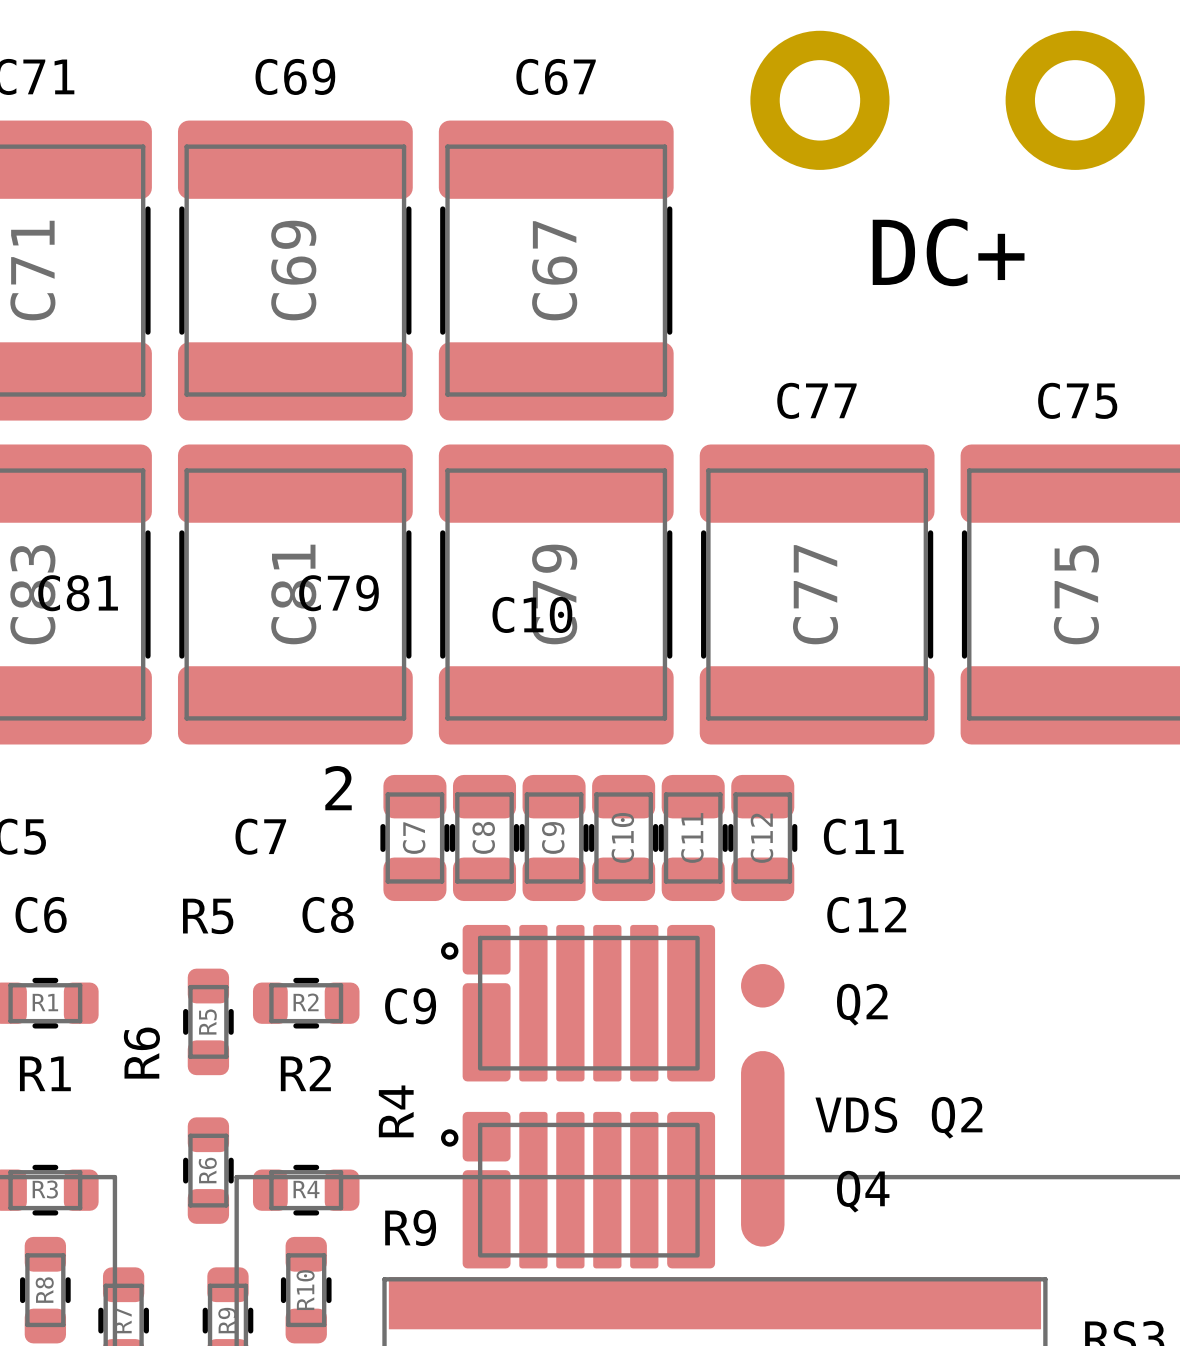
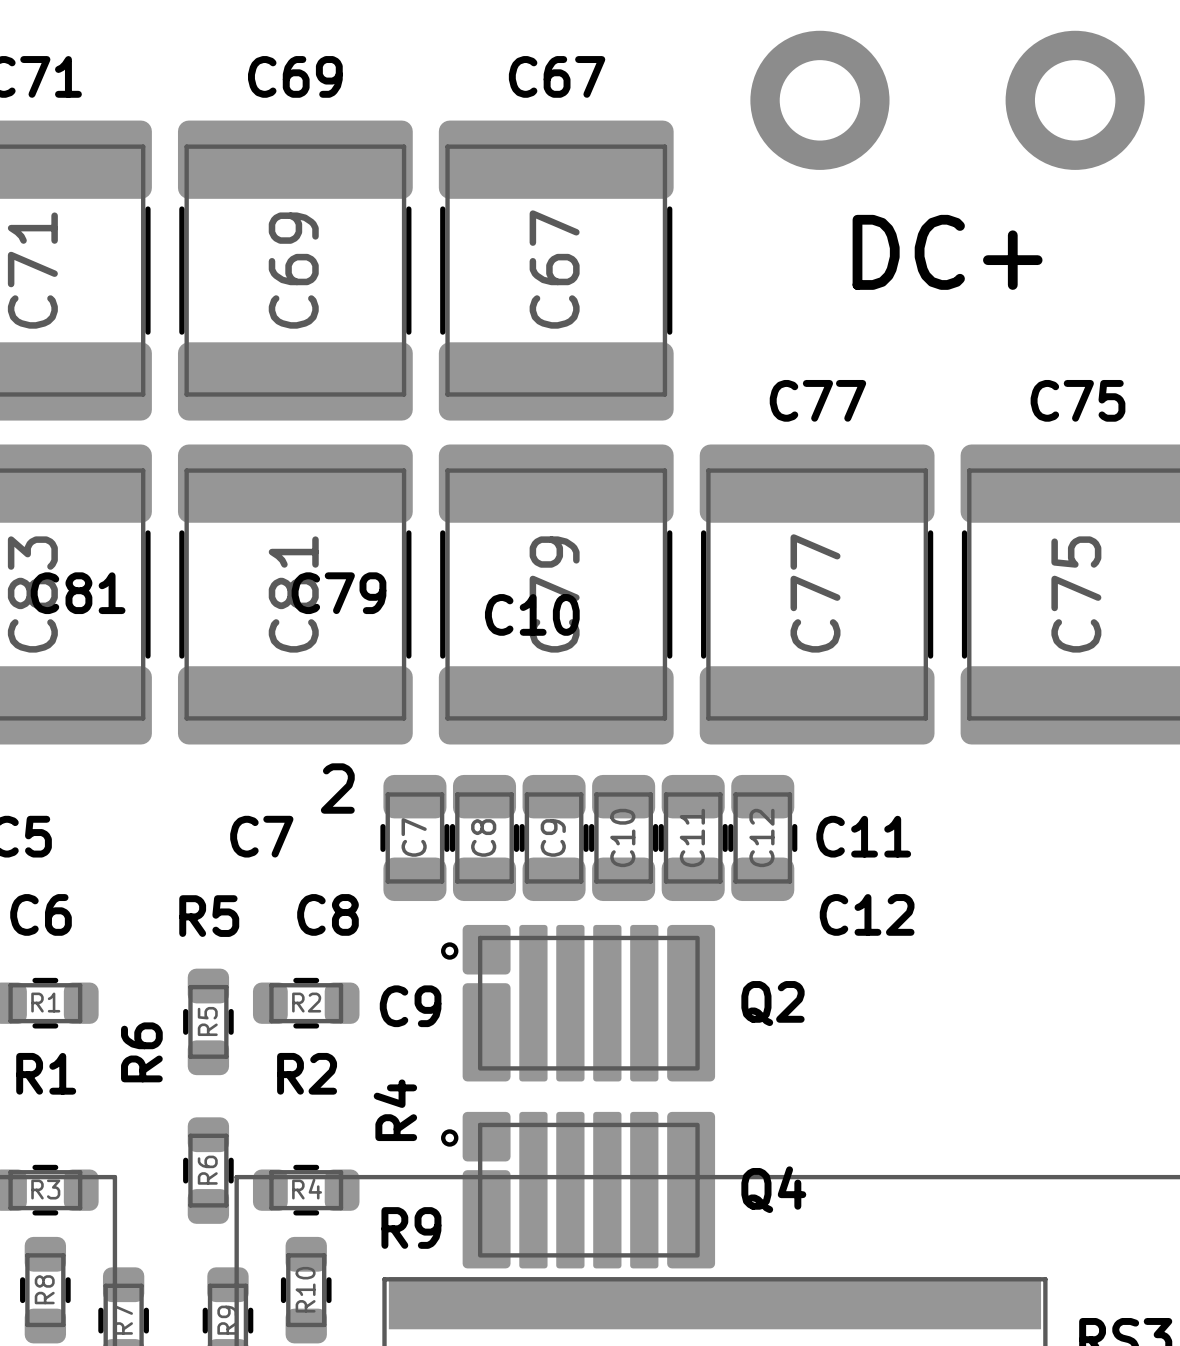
text position: Q2 (862, 1004) -> Q2 (772, 1003)
part: (762, 1105) -> none
text: VDS Q2 (898, 1117) -> none
text position: Q4 (863, 1191) -> Q4 (773, 1189)

